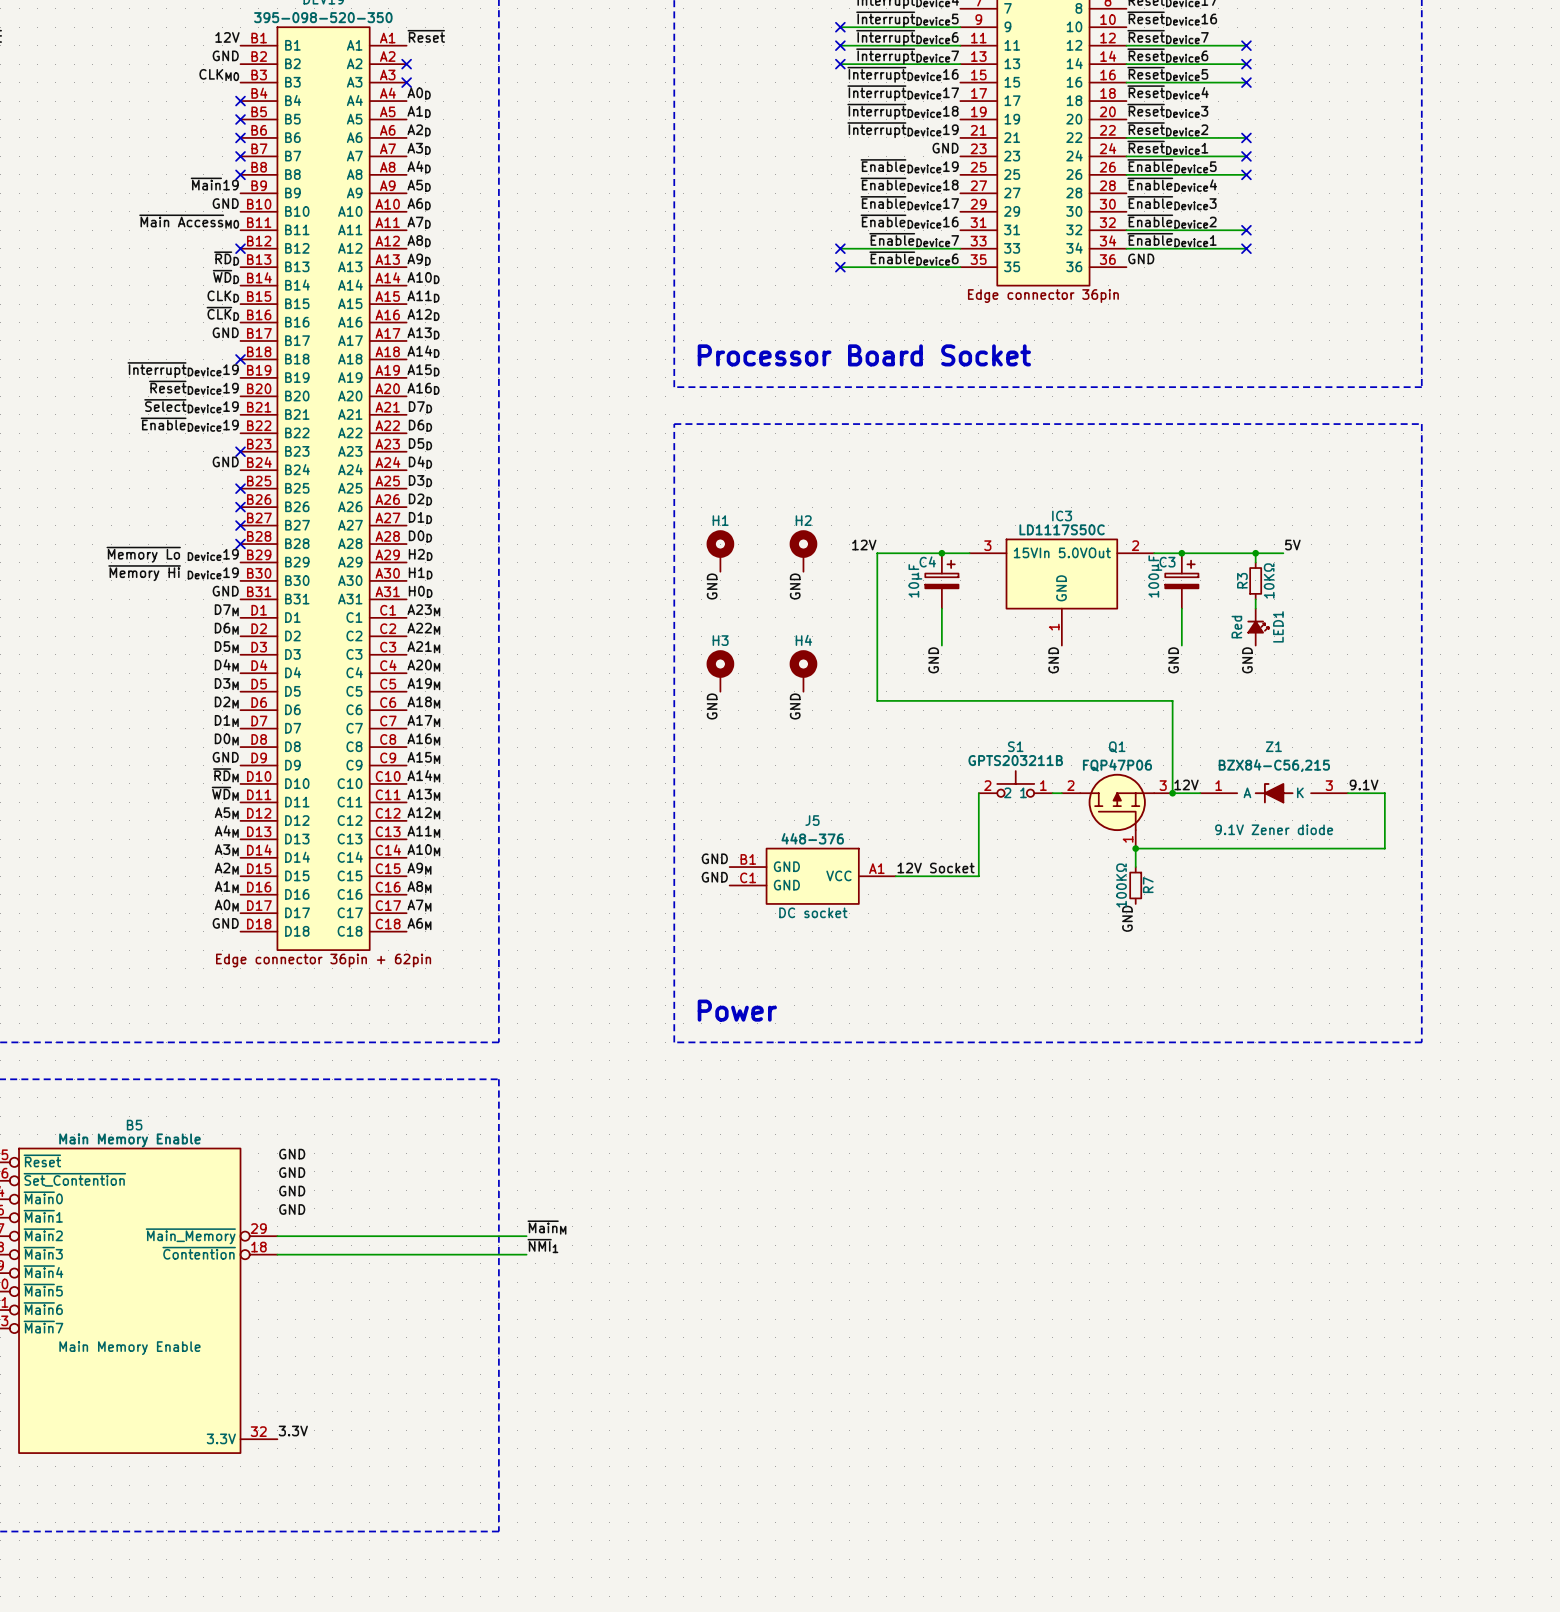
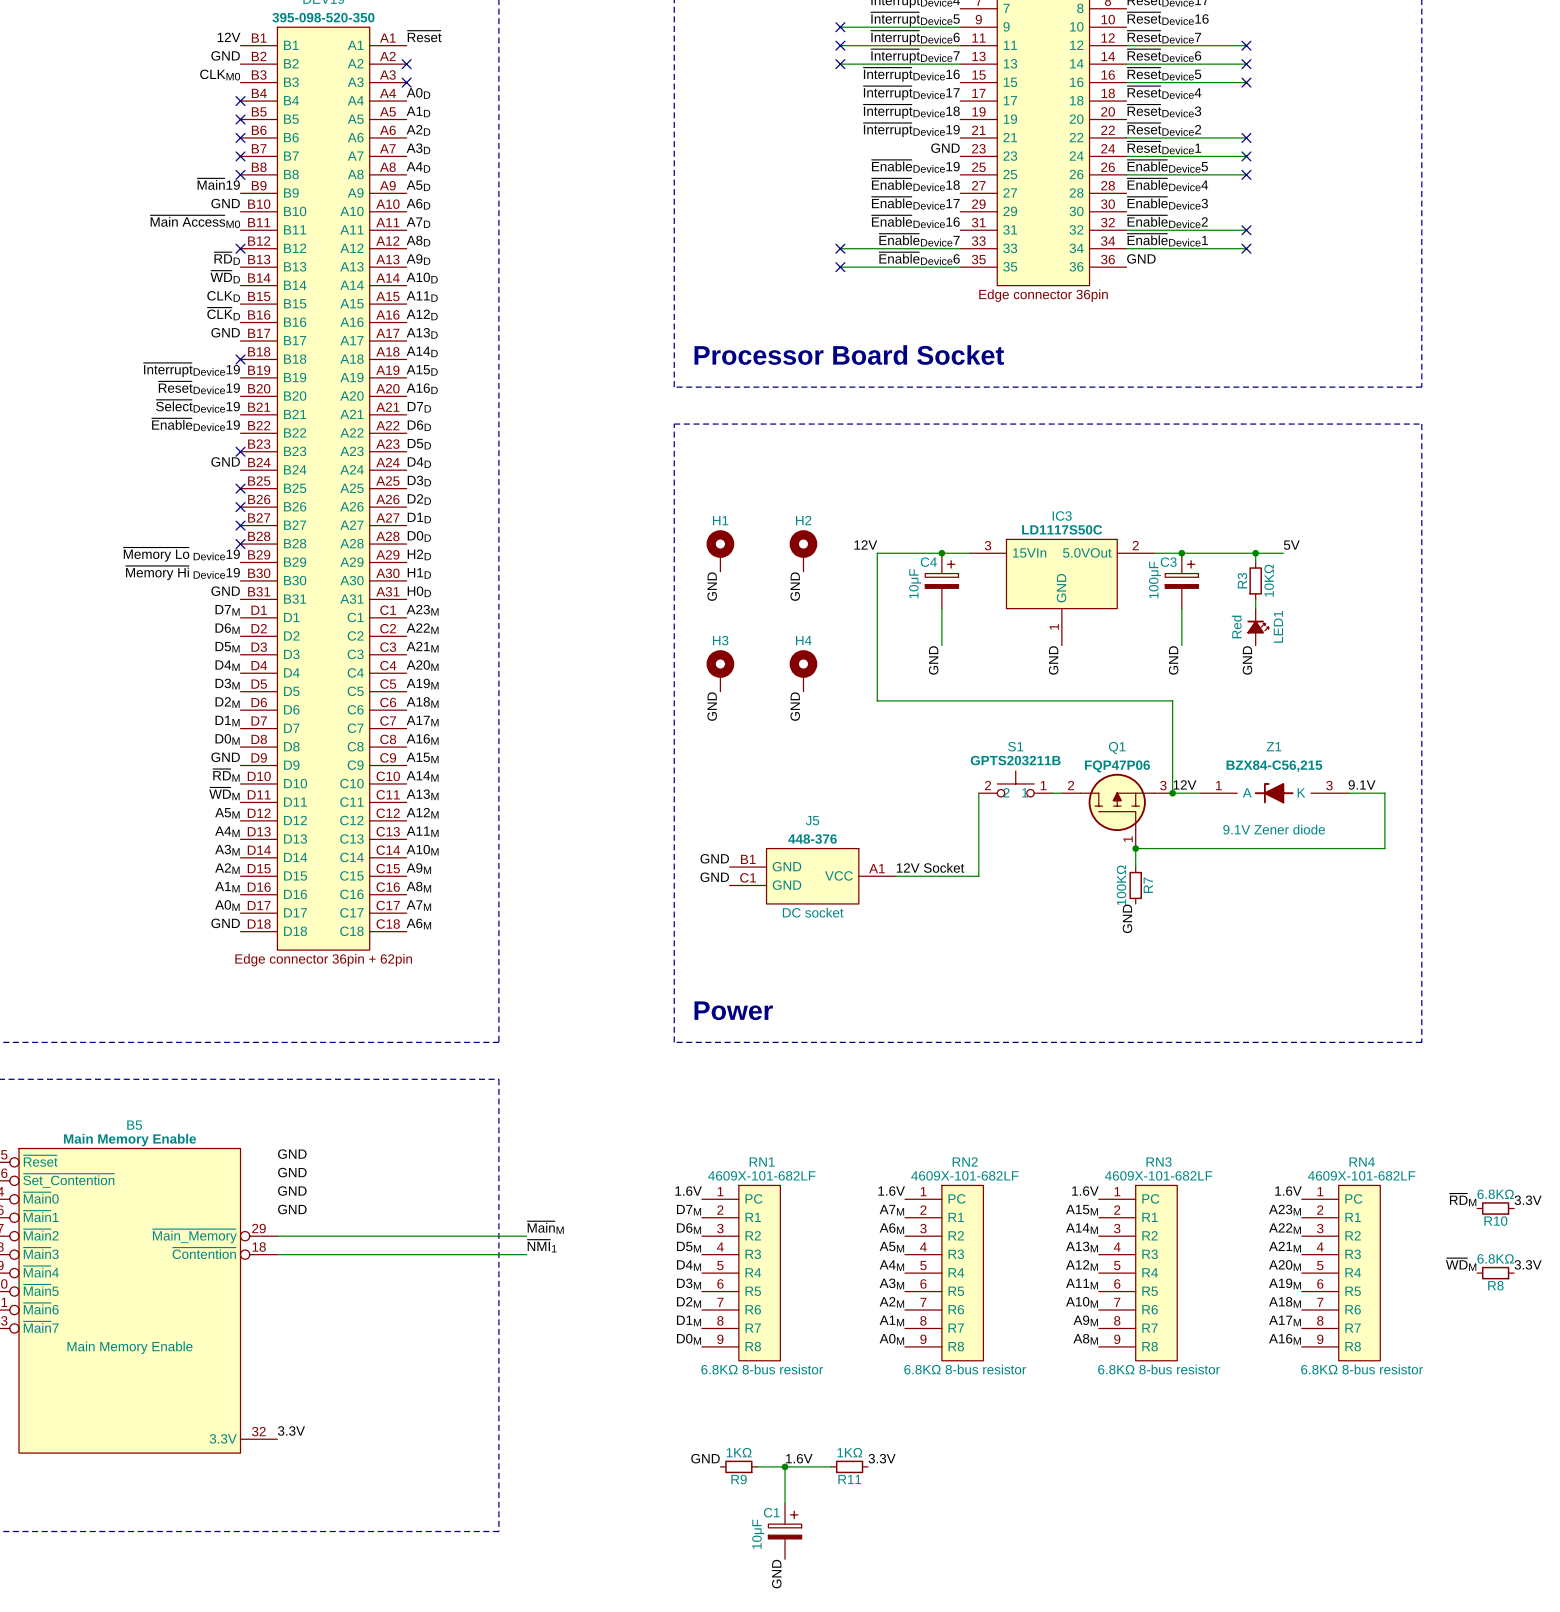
label: none -> 1.6V (688, 1191)
label: none -> 1.6V (891, 1191)
label: none -> 1.6V (1085, 1191)
label: none -> 1.6V (1288, 1191)
label: none -> ~{RD}M (1463, 1199)
label: none -> 3.3V (1528, 1200)
R10: none -> 6.8KΩ (1495, 1208)
label: none -> D7M (689, 1210)
label: none -> A7M (891, 1210)
label: none -> A15M (1081, 1210)
label: none -> A23M (1284, 1210)
label: none -> D6M (689, 1228)
label: none -> A6M (891, 1228)
label: none -> A14M (1081, 1228)
label: none -> A22M (1284, 1228)
label: none -> D5M (689, 1247)
label: none -> A5M (891, 1247)
label: none -> A13M (1081, 1247)
label: none -> A21M (1284, 1247)
label: none -> ~{WD}M (1461, 1264)
label: none -> 3.3V (1528, 1264)
label: none -> D4M (689, 1265)
label: none -> A4M (891, 1265)
label: none -> A12M (1081, 1265)
label: none -> A20M (1284, 1265)
RN1: none -> 4609X-101-682LF (741, 1273)
RN2: none -> 4609X-101-682LF (944, 1273)
RN3: none -> 4609X-101-682LF (1138, 1273)
RN4: none -> 4609X-101-682LF (1341, 1273)
R8: none -> 6.8KΩ (1495, 1273)
label: none -> D3M (689, 1283)
label: none -> A3M (891, 1283)
label: none -> A11M (1081, 1284)
label: none -> A19M (1284, 1283)
label: none -> D2M (689, 1302)
label: none -> A2M (891, 1302)
label: none -> A10M (1081, 1302)
label: none -> A18M (1284, 1302)
label: none -> D1M (689, 1320)
label: none -> A1M (891, 1320)
label: none -> A9M (1085, 1320)
label: none -> A17M (1284, 1320)
label: none -> D0M (689, 1339)
label: none -> A0M (891, 1339)
label: none -> A8M (1085, 1339)
label: none -> A16M (1284, 1339)
label: none -> GND (705, 1458)
label: none -> 1.6V (799, 1458)
label: none -> 3.3V (882, 1458)
R9: none -> 1KΩ (738, 1466)
wire: none -> (757, 1466) (831, 1466)
wire: none -> (785, 1466) (785, 1503)
junction: none -> (785, 1466)
R11: none -> 1KΩ (849, 1466)
C1: none -> 10μF (785, 1531)
label: none -> GND (776, 1574)

